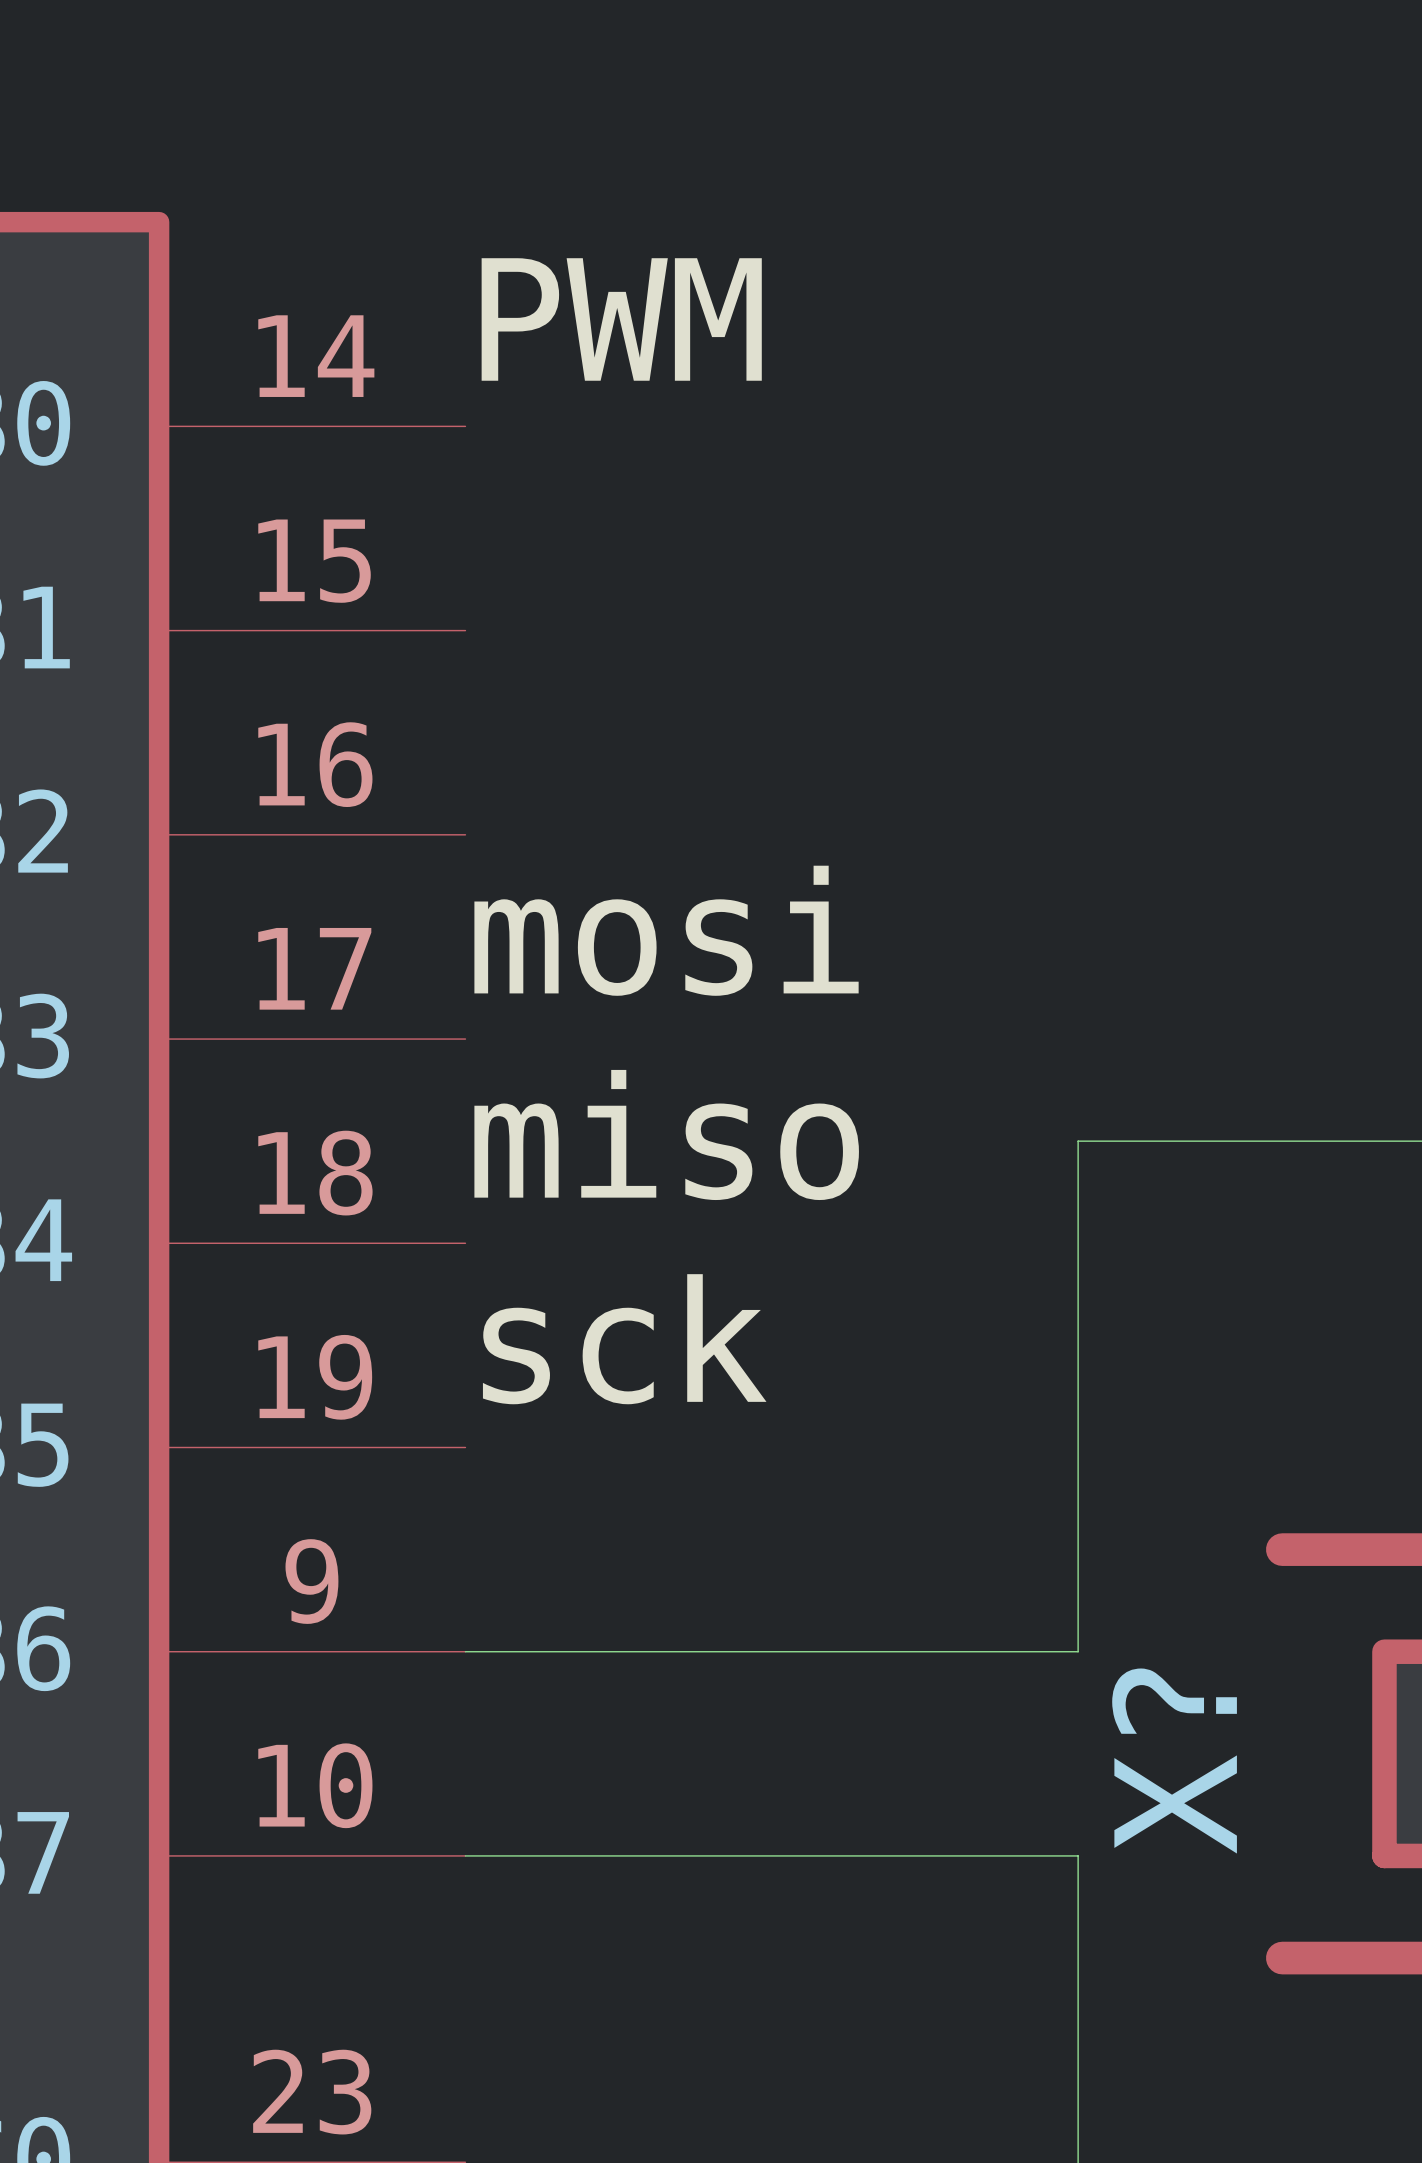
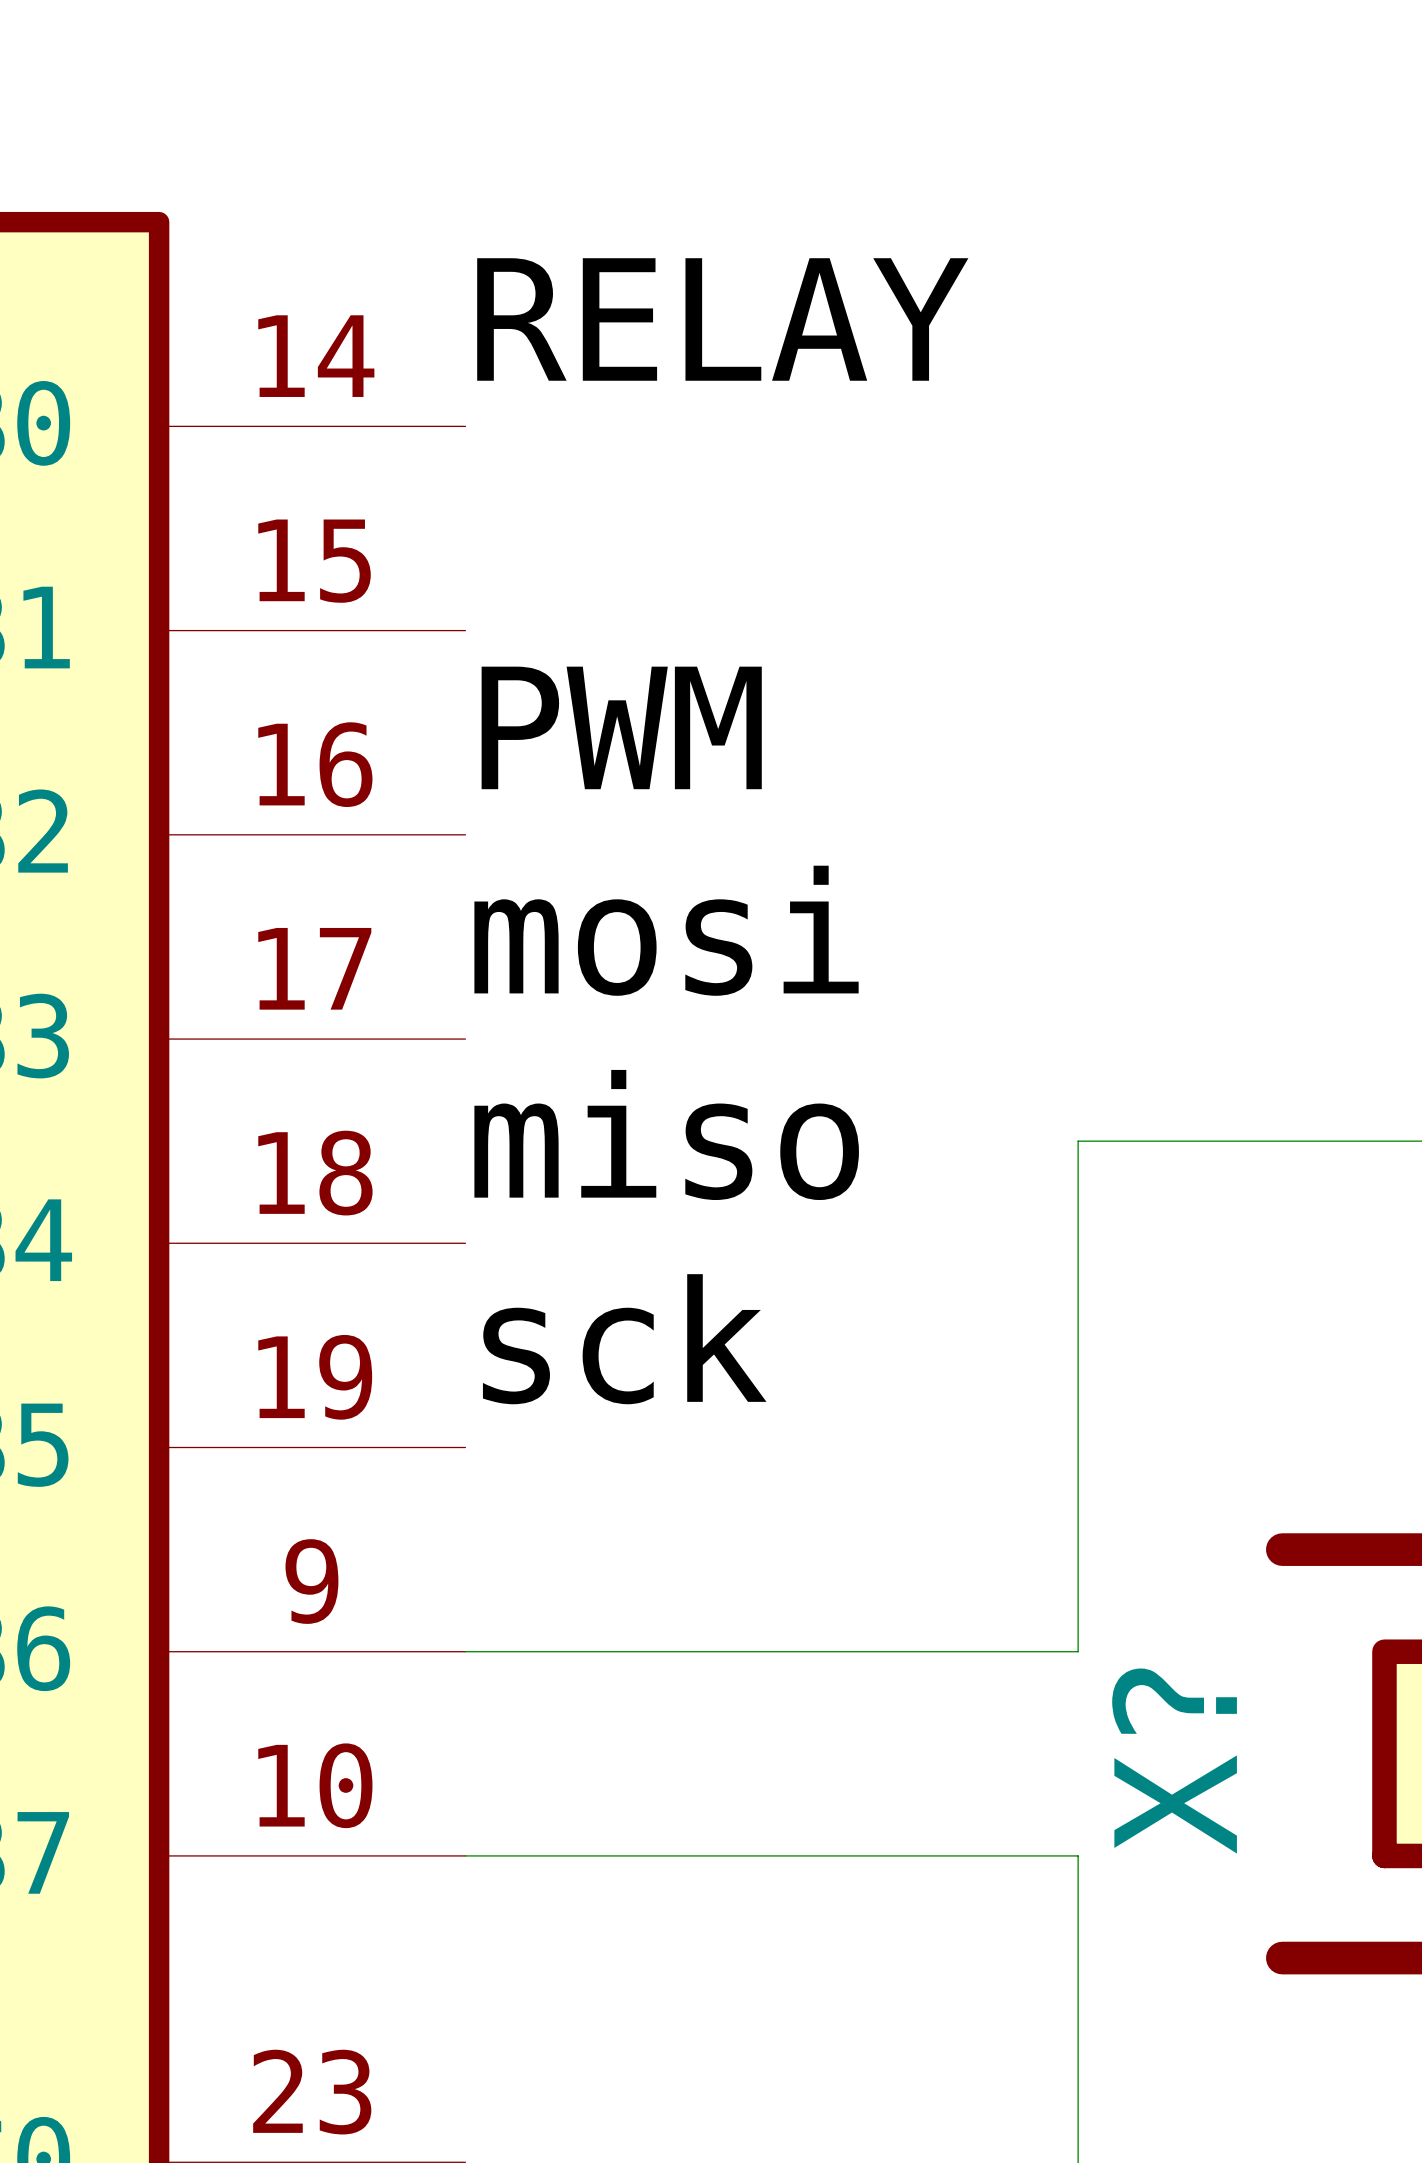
label: PWM (621, 319) -> RELAY (722, 319)
label: none -> PWM (621, 727)

